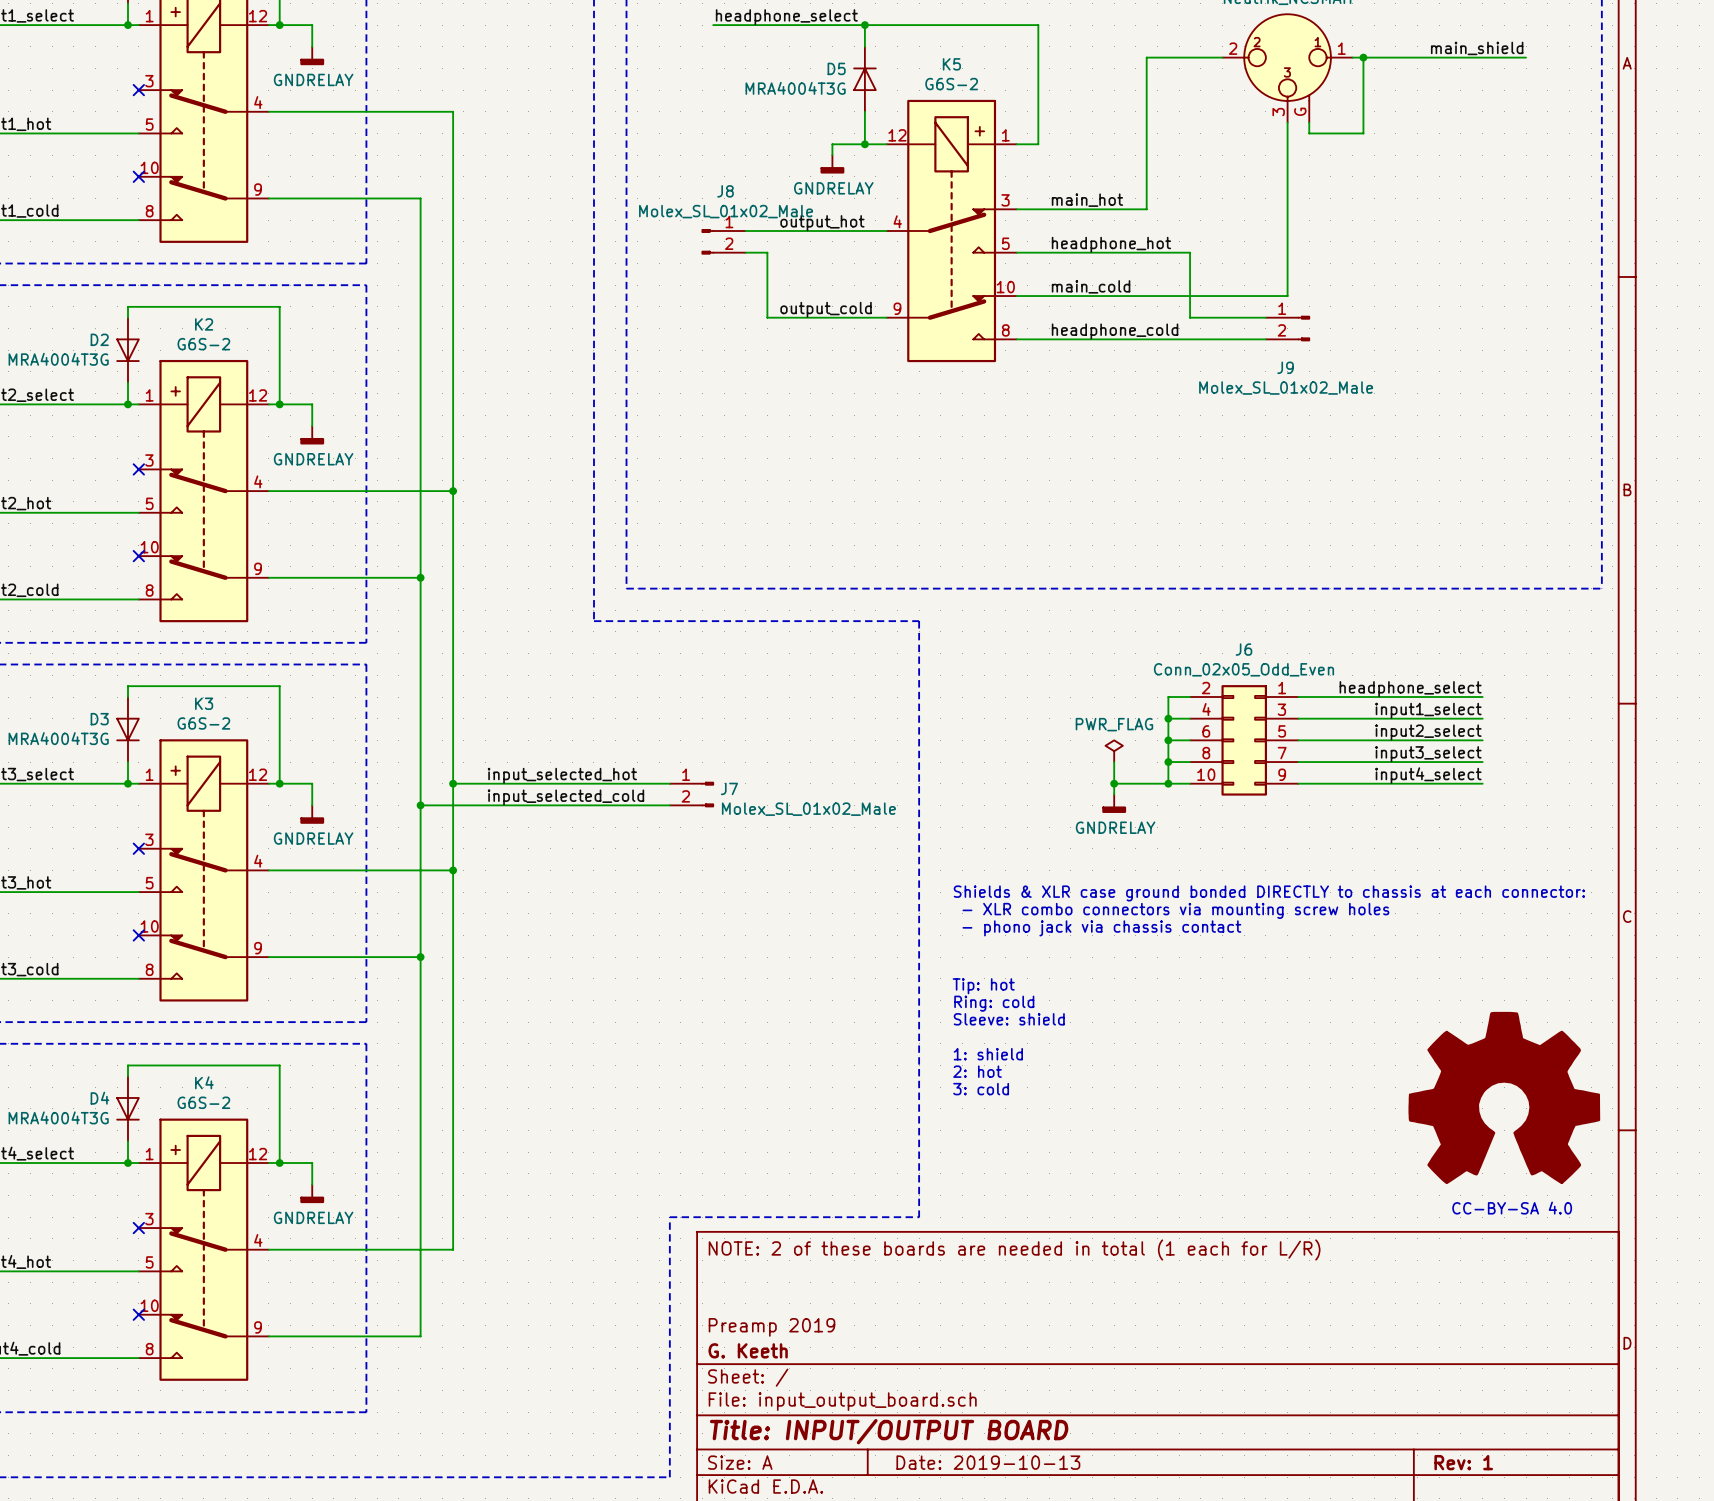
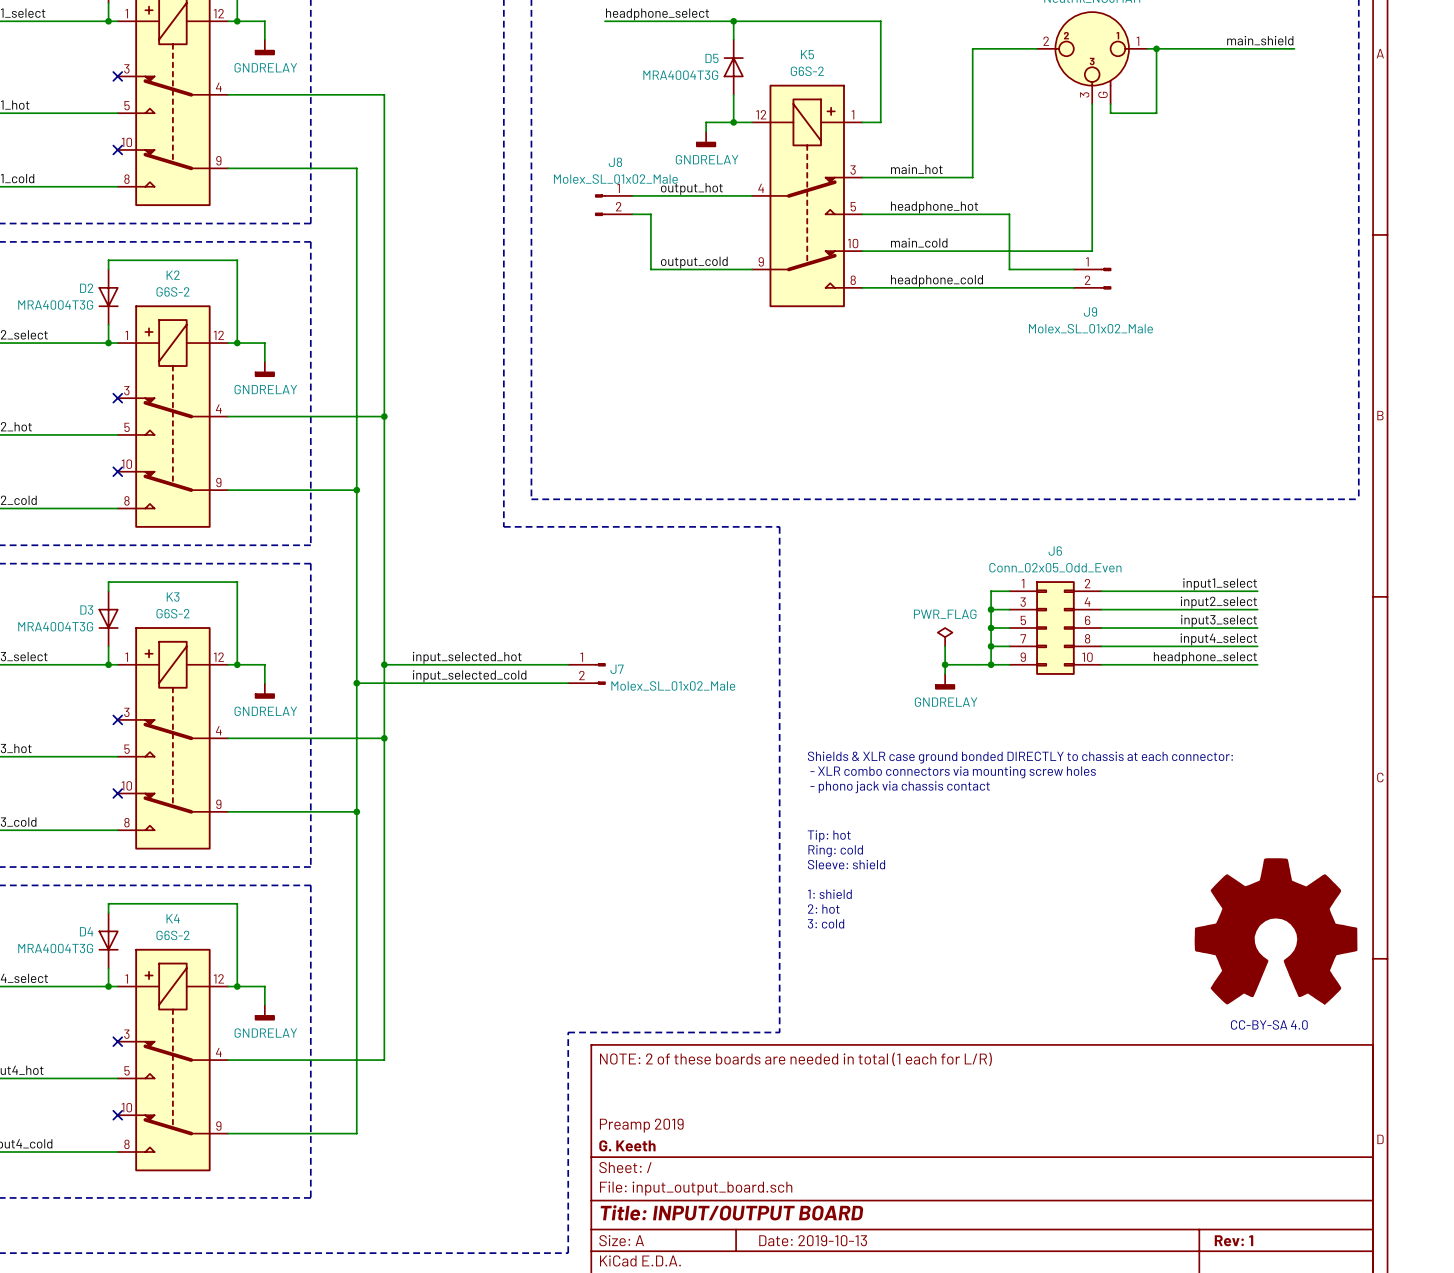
label: headphone_select (1410, 689) -> input1_select (1220, 584)
label: input1_select (1428, 710) -> input2_select (1218, 602)
label: input2_select (1428, 732) -> input3_select (1218, 621)
J6 flip: as is (1244, 740) -> left-right (1055, 628)
label: input3_select (1428, 754) -> input4_select (1218, 639)
label: input4_select (1428, 775) -> headphone_select (1205, 657)

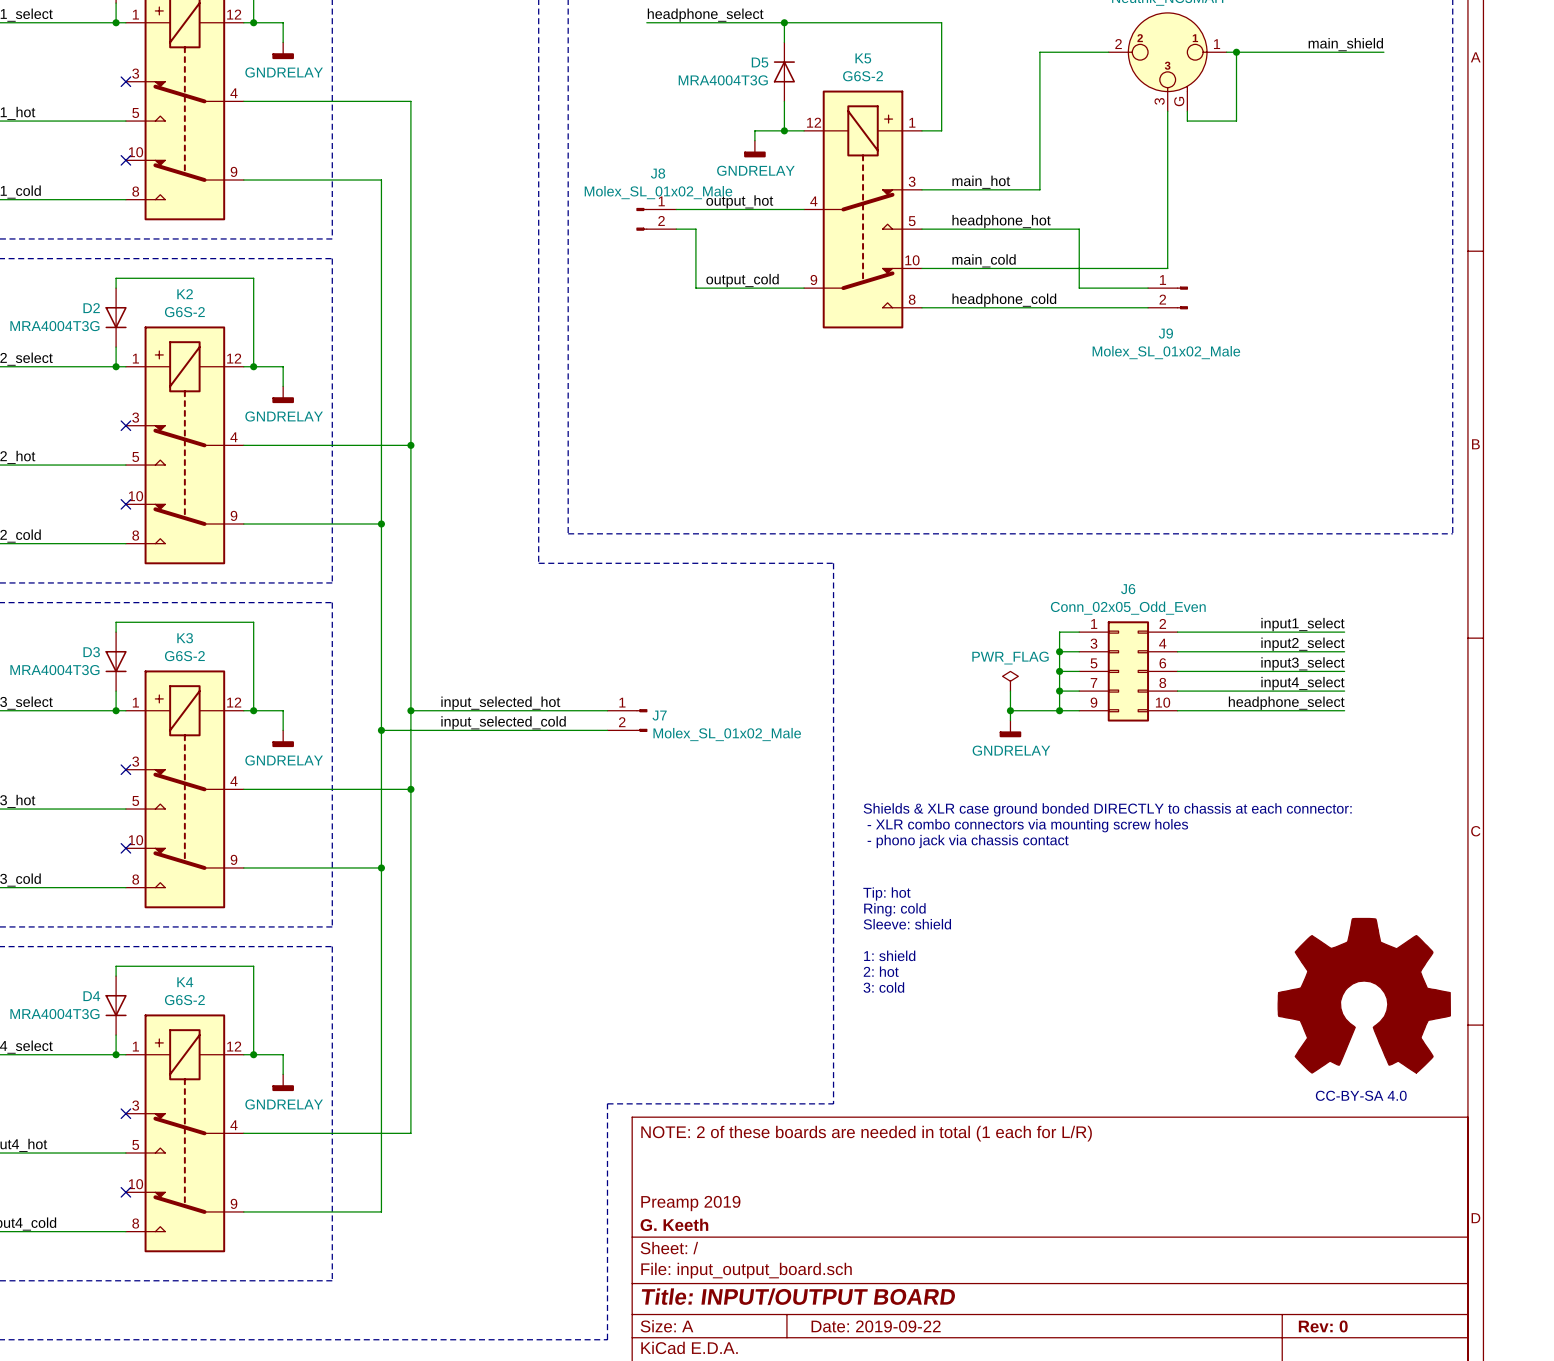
title block: Date: 2019-10-13 (813, 1240) -> Date: 2019-09-22 (876, 1326)
title block: Rev: 1 (1233, 1240) -> Rev: 0 (1323, 1326)

